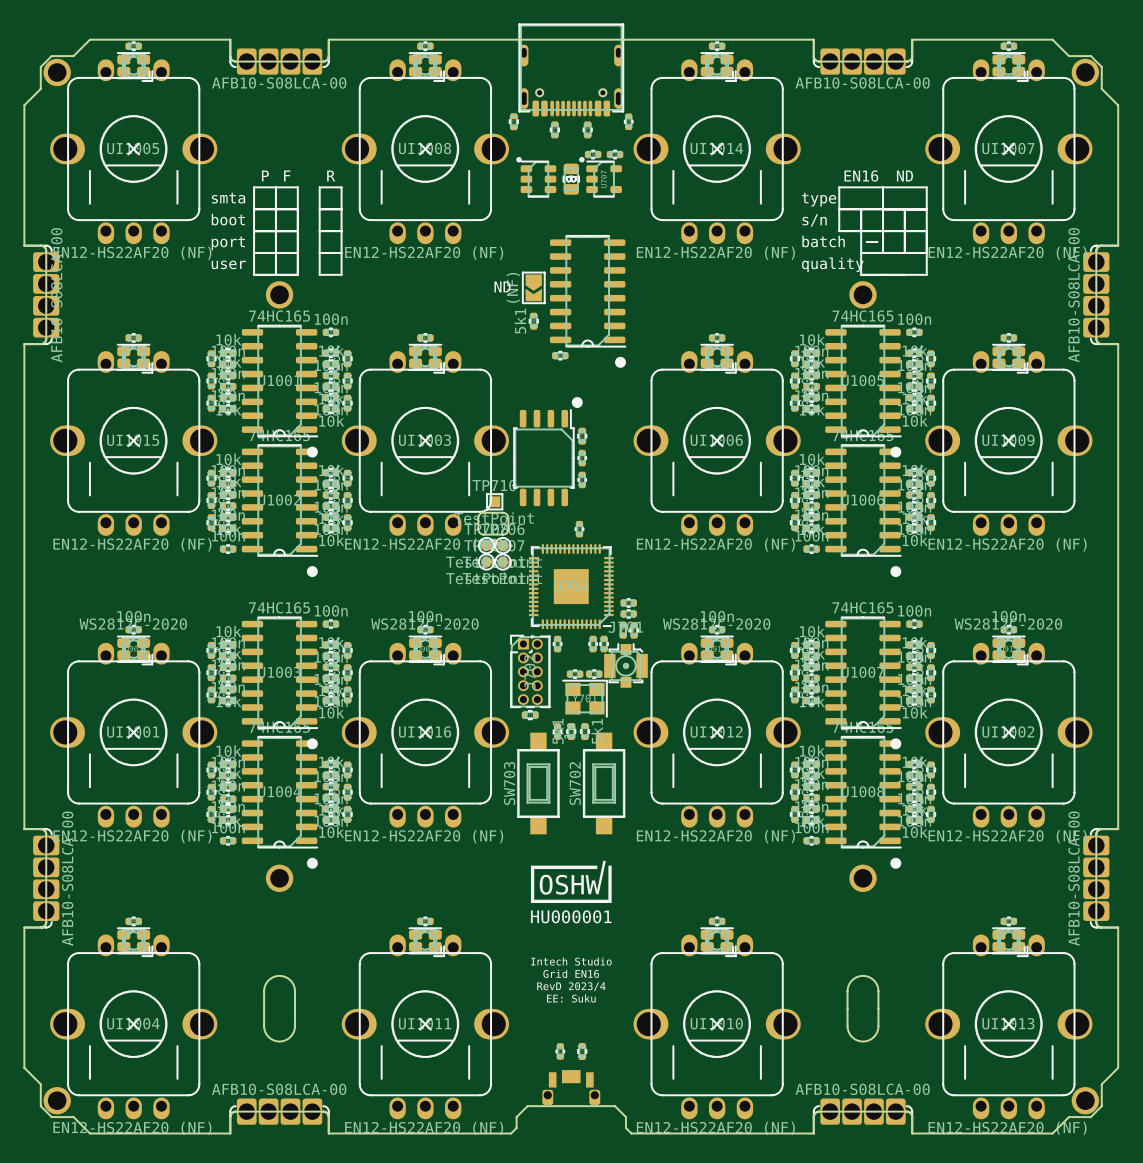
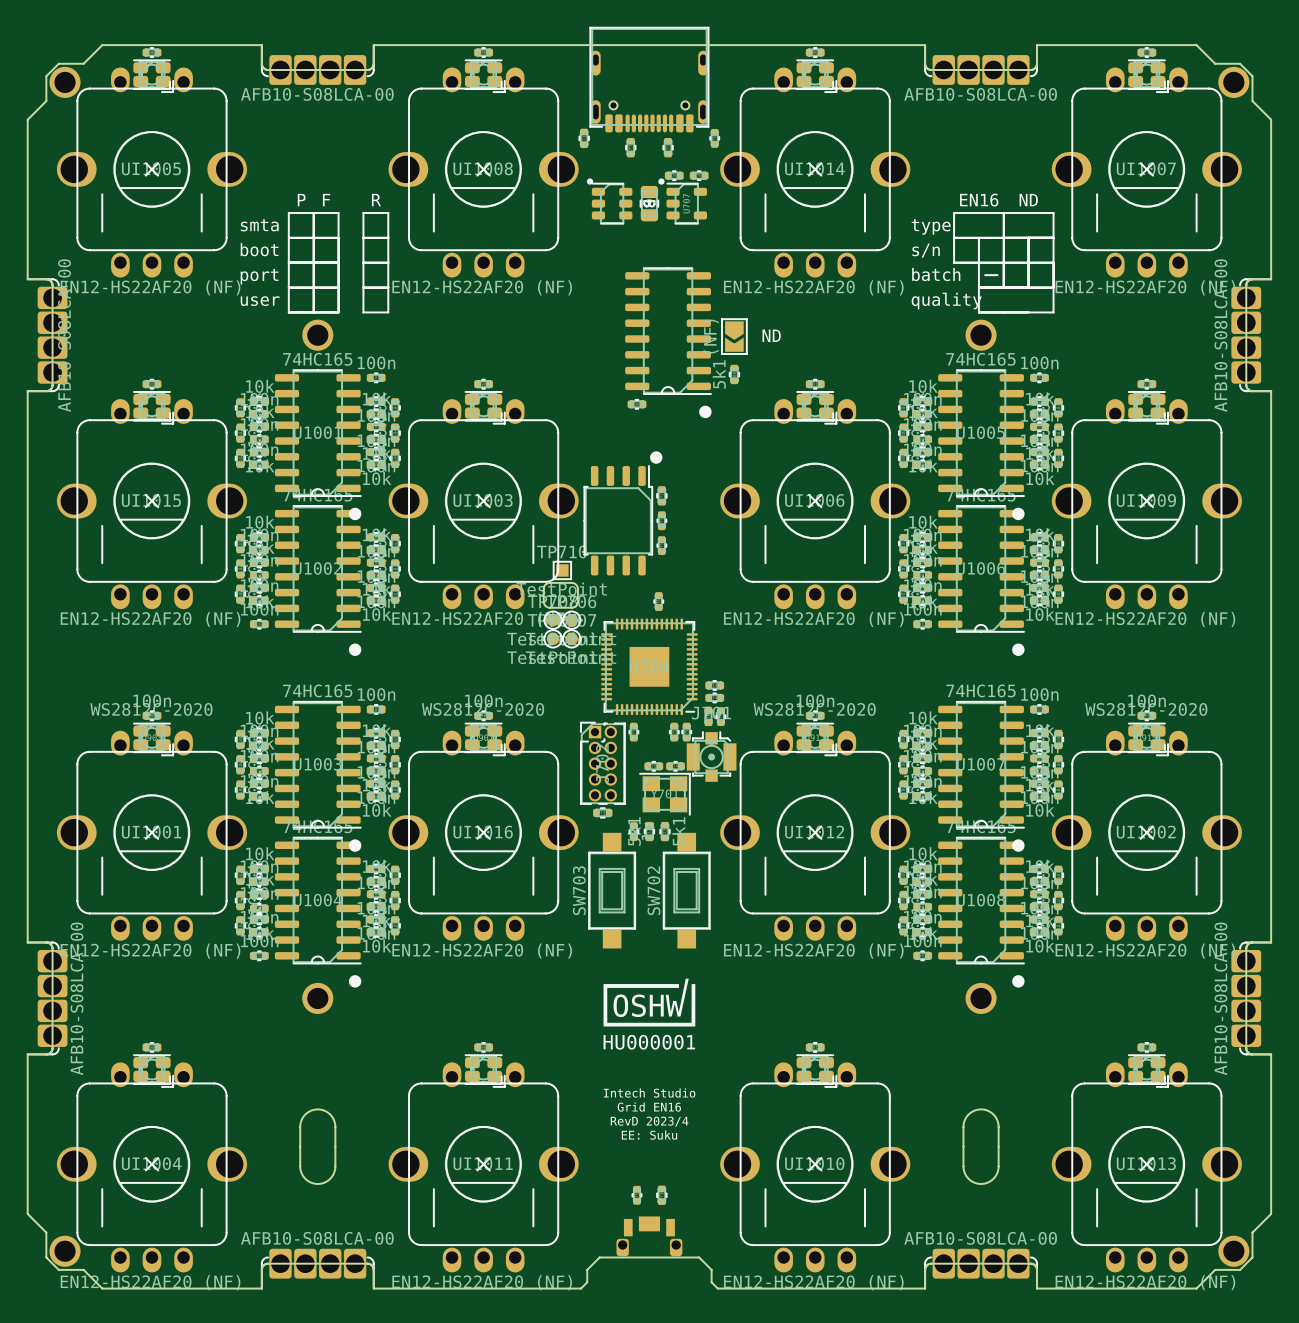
text position: ND (502, 286) -> ND (771, 335)
part position: (533, 287) -> (734, 336)
part position: (533, 321) -> (734, 374)

